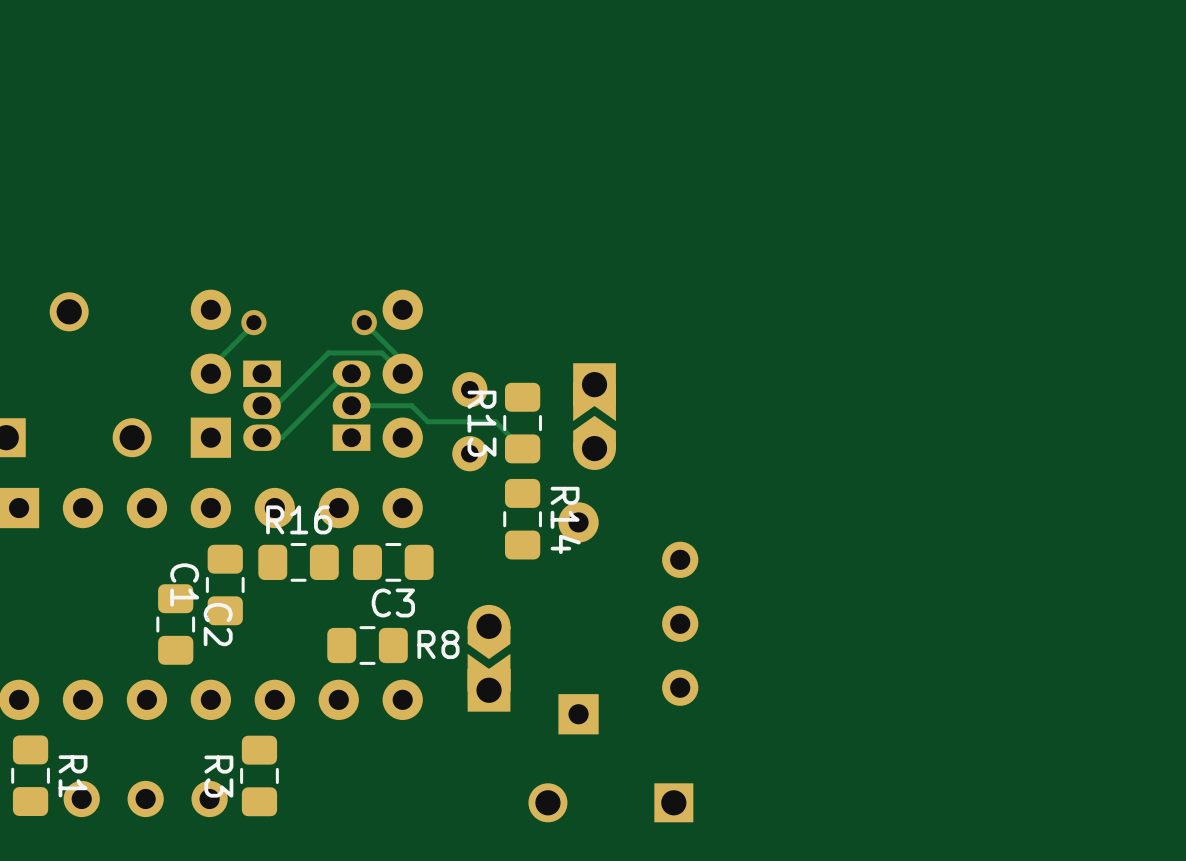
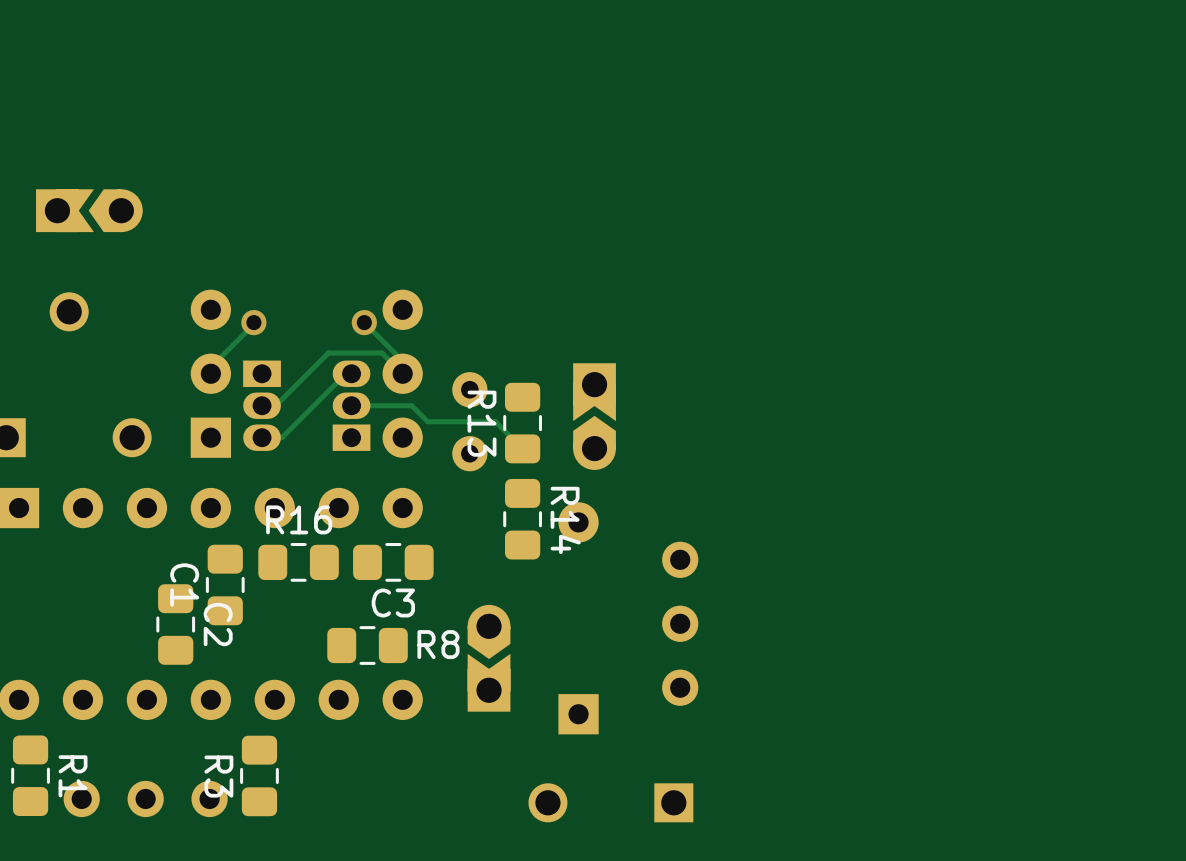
part: none -> (89, 210)

